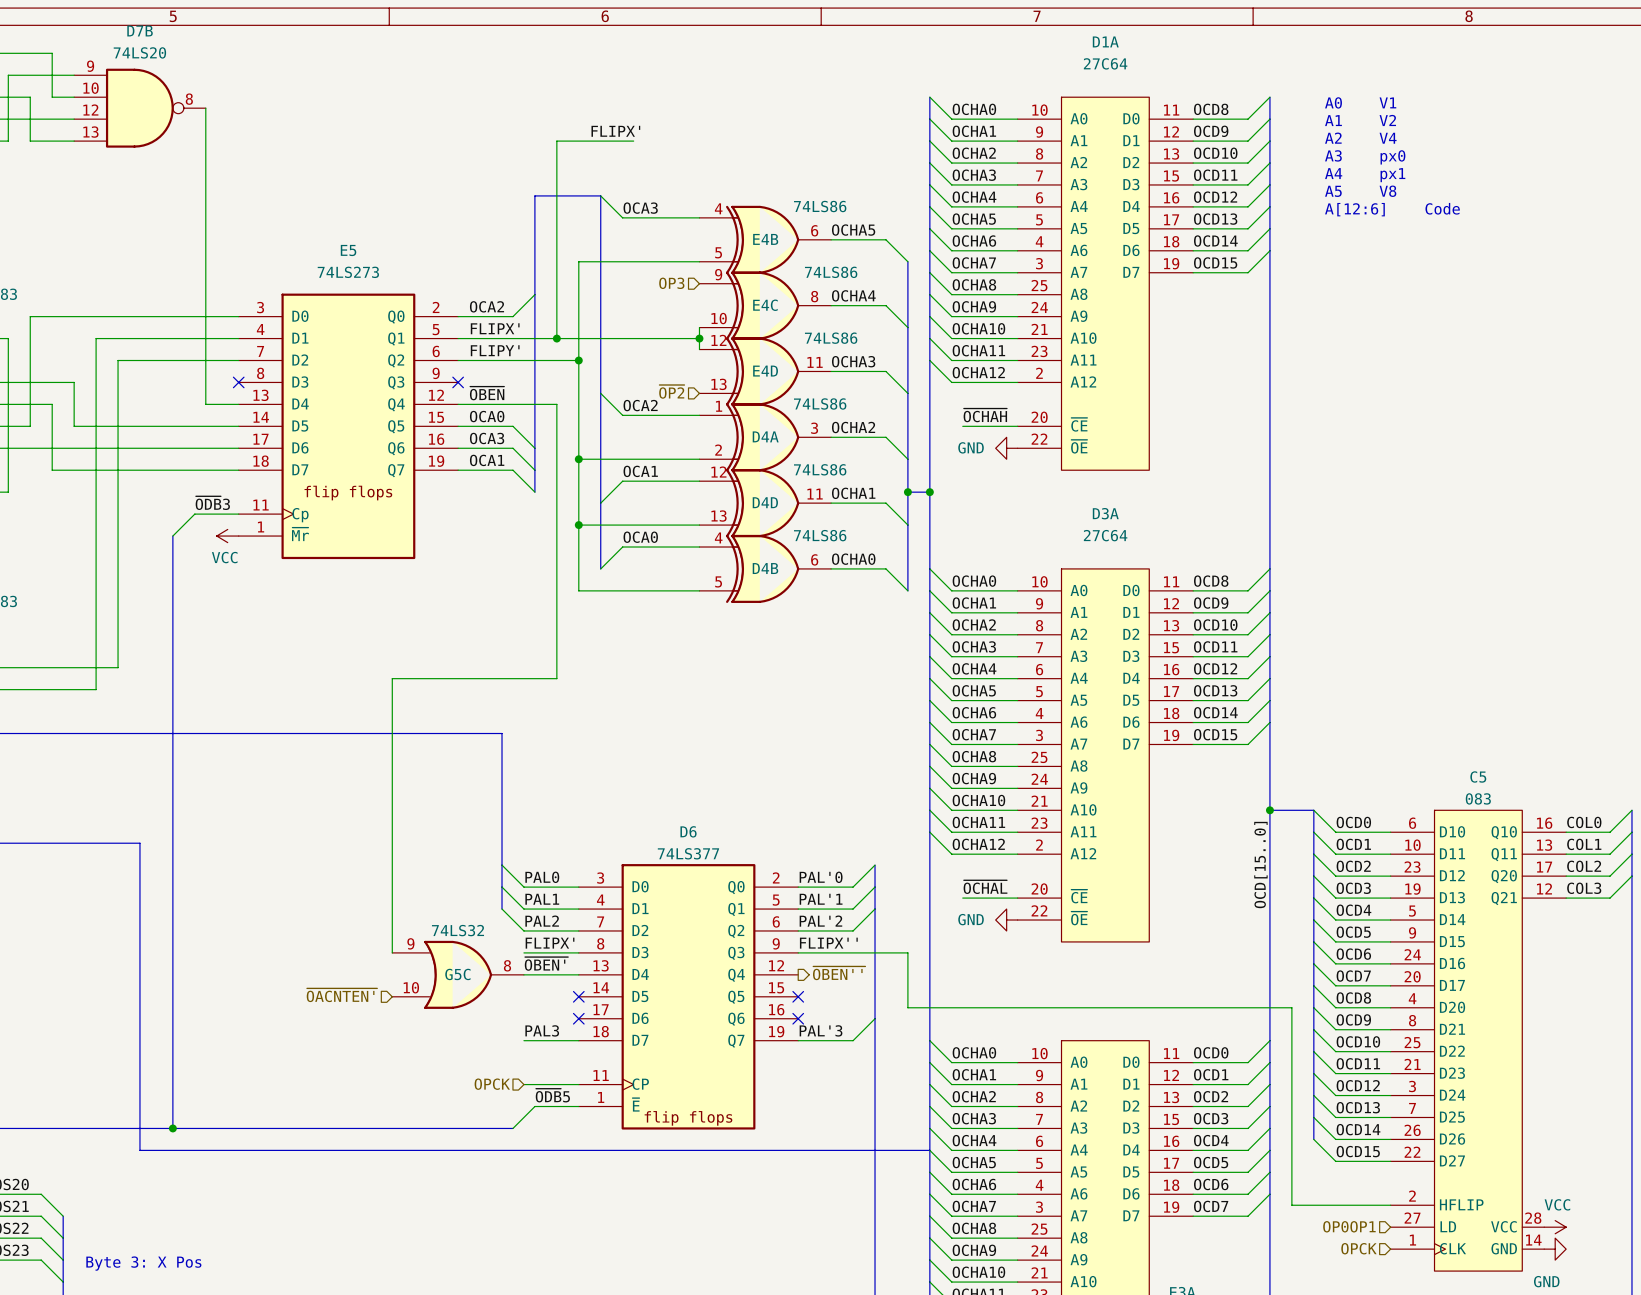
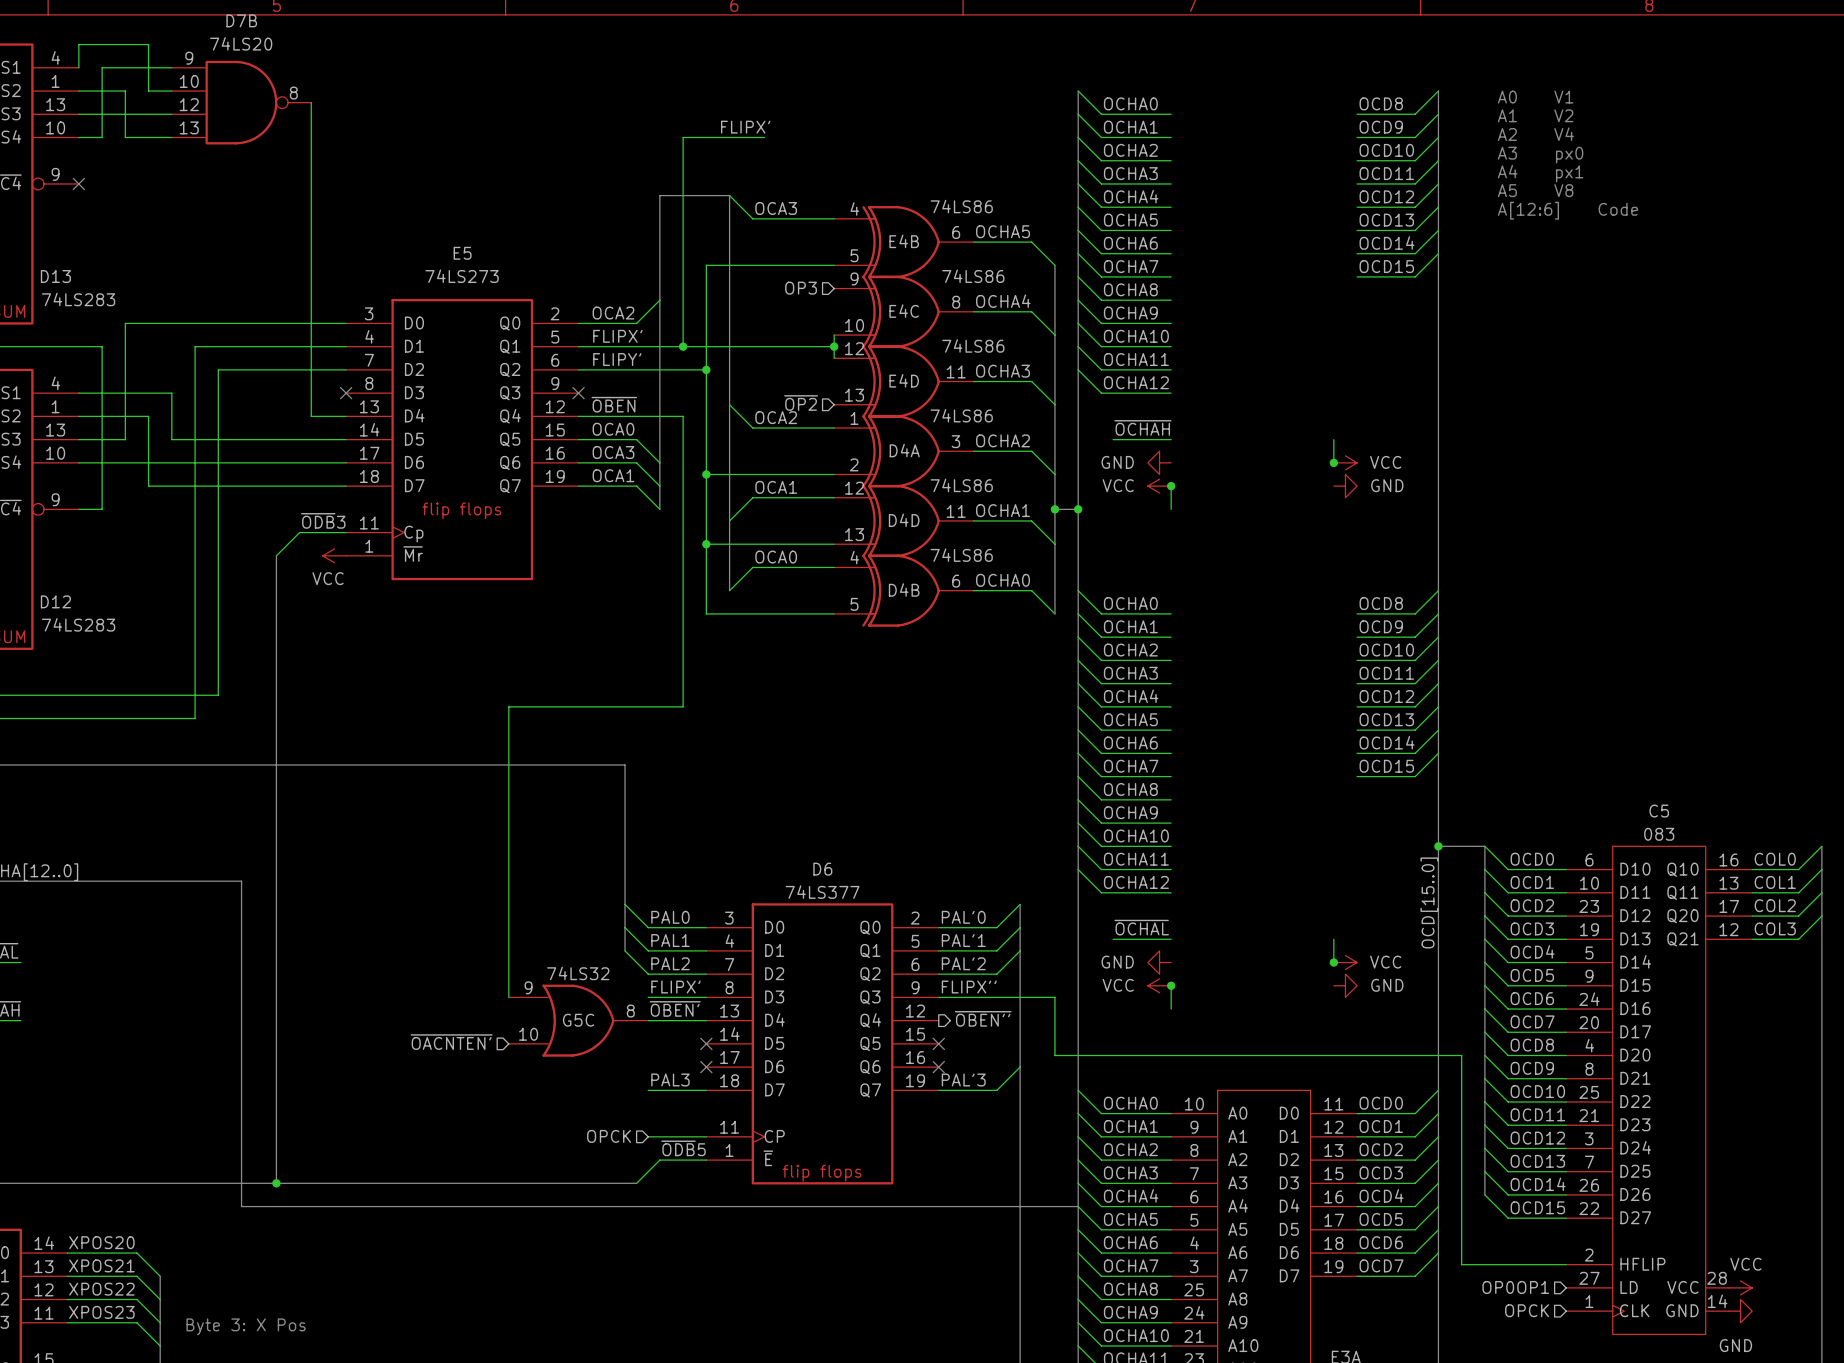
D1A: 27C64 (1105, 283) -> none
wire: none -> (1333, 439) (1333, 462)
junction: none -> (1333, 462)
power symbol: none -> VCC (1345, 462)
power symbol: none -> VCC (1159, 486)
wire: none -> (1171, 486) (1171, 509)
junction: none -> (1171, 486)
power symbol: none -> GND (1345, 486)
D3A: 27C64 (1105, 755) -> none
wire: none -> (1333, 939) (1333, 962)
junction: none -> (1333, 962)
power symbol: none -> VCC (1345, 962)
power symbol: none -> VCC (1159, 985)
wire: none -> (1171, 985) (1171, 1009)
junction: none -> (1171, 985)
power symbol: none -> GND (1345, 985)

